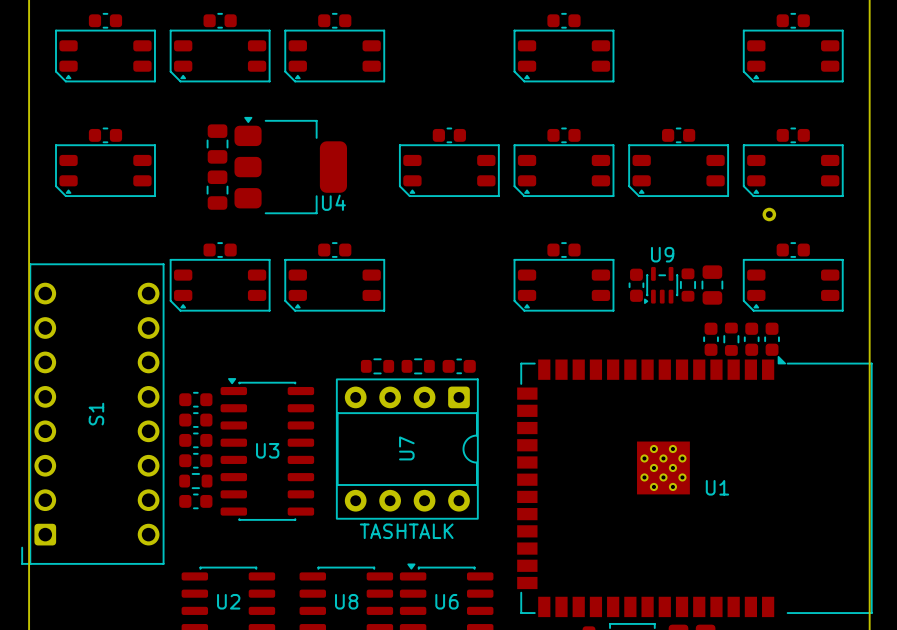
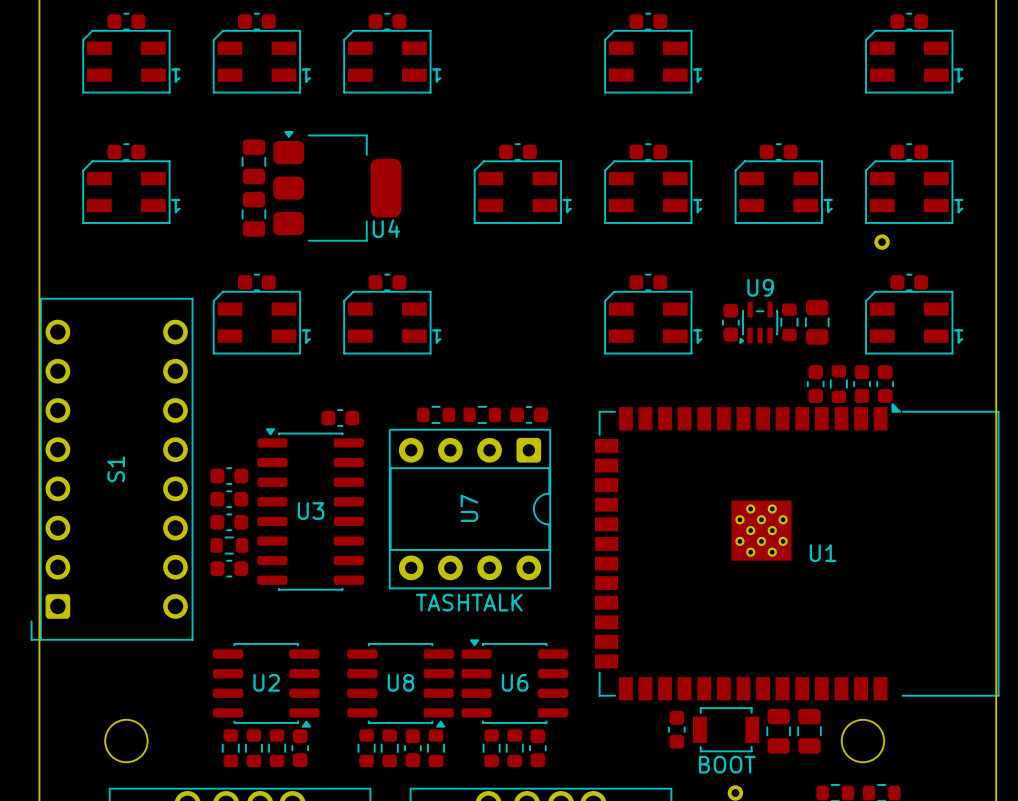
part footprint: [55, 29, 156, 83] -> [82, 29, 171, 94]
part footprint: [169, 29, 271, 83] -> [212, 29, 302, 94]
part footprint: [284, 29, 386, 83] -> [343, 29, 432, 94]
part footprint: [513, 29, 615, 83] -> [604, 29, 693, 94]
part footprint: [742, 29, 844, 83] -> [865, 29, 954, 94]
part footprint: [55, 144, 156, 197] -> [82, 160, 171, 224]
part footprint: [399, 144, 500, 197] -> [473, 160, 562, 224]
part footprint: [513, 144, 615, 197] -> [604, 160, 693, 224]
part footprint: [628, 144, 729, 197] -> [734, 160, 823, 224]
part footprint: [742, 144, 844, 197] -> [865, 160, 954, 224]
part footprint: [169, 259, 271, 312] -> [212, 290, 302, 355]
part footprint: [284, 259, 386, 312] -> [343, 290, 432, 355]
part footprint: [513, 259, 615, 312] -> [604, 290, 693, 355]
part footprint: [742, 259, 844, 312] -> [865, 290, 954, 355]
part position: (195, 399) -> (340, 418)

